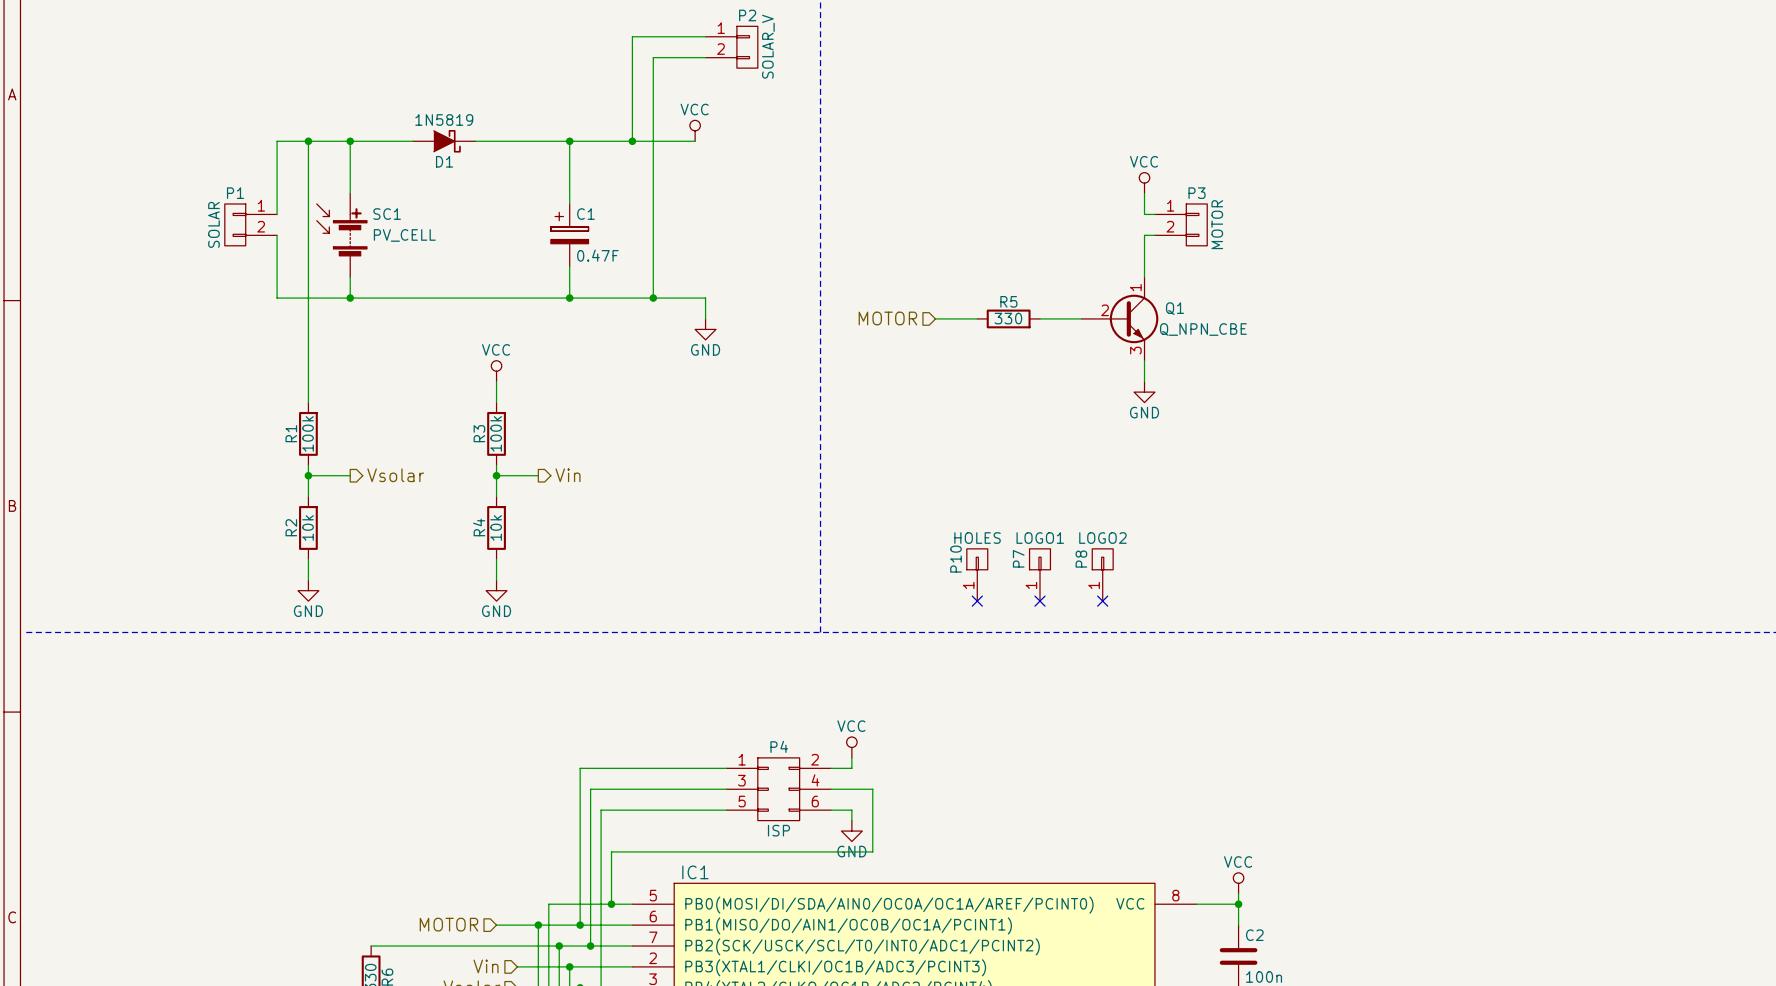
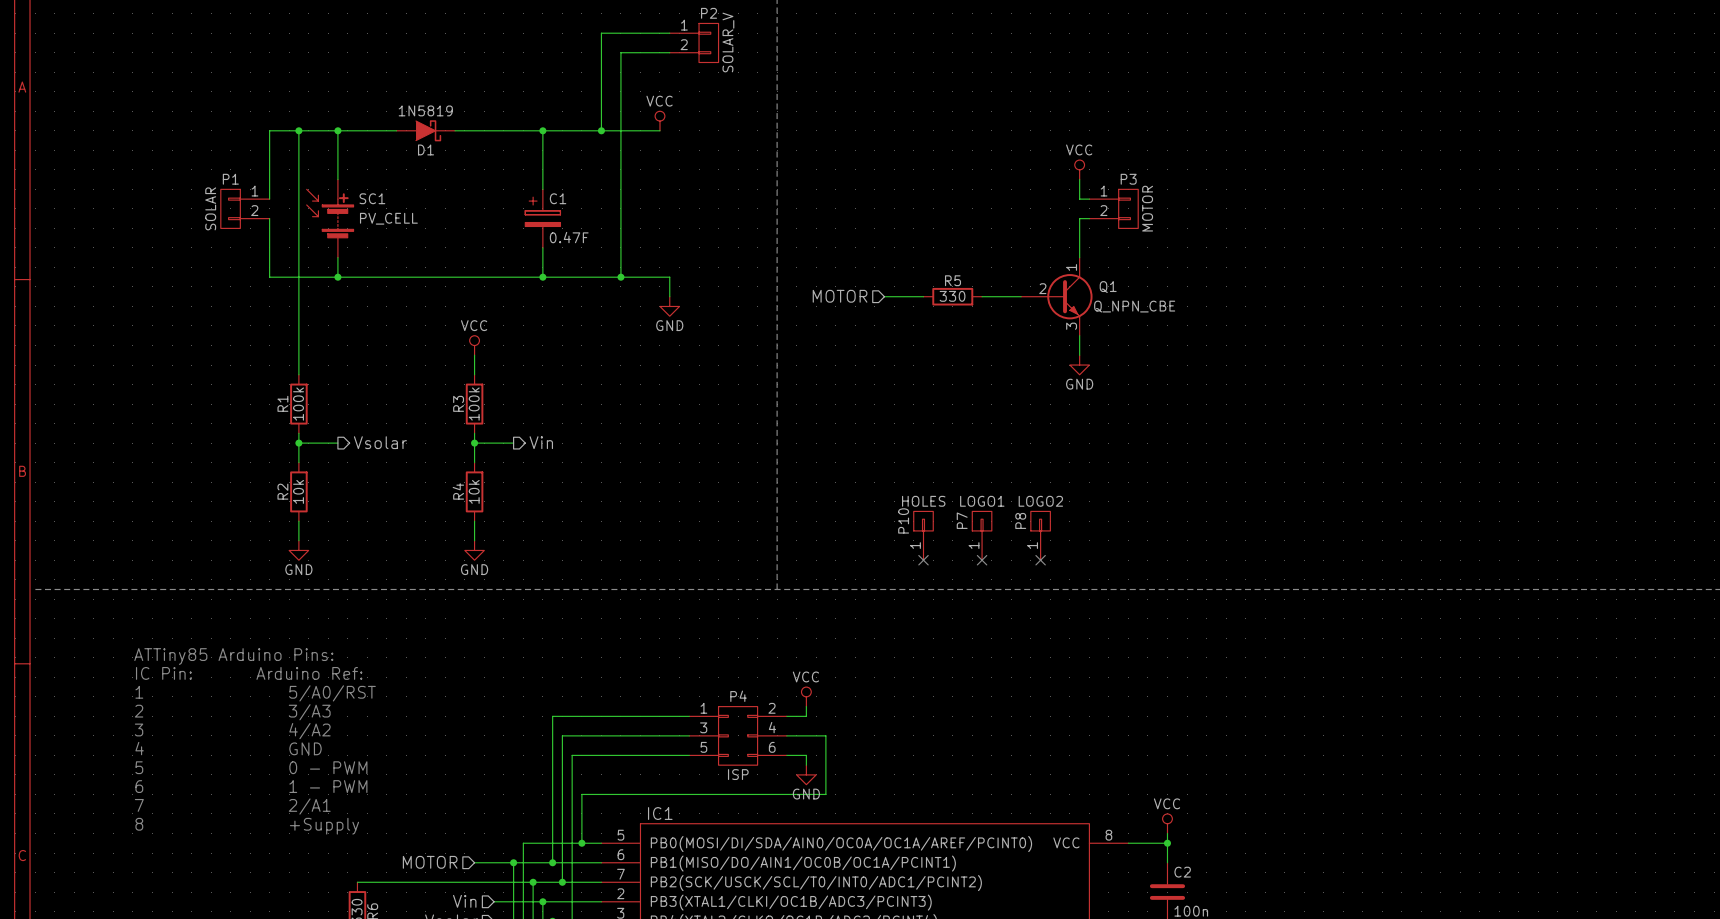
text: none -> ATTiny85 Arduino Pins: (233, 656)
text: none -> IC Pin: Arduino Ref: (249, 673)
text: none -> 1 5/A0/RST (255, 693)
text: none -> 2 3/A3 (232, 712)
text: none -> 3 4/A2 (232, 731)
text: none -> 4 GND (228, 748)
text: none -> 5 0 - PWM (251, 767)
text: none -> 6 1 - PWM (251, 786)
text: none -> 7 2/A1 (232, 806)
text: none -> 8 +Supply (247, 826)

